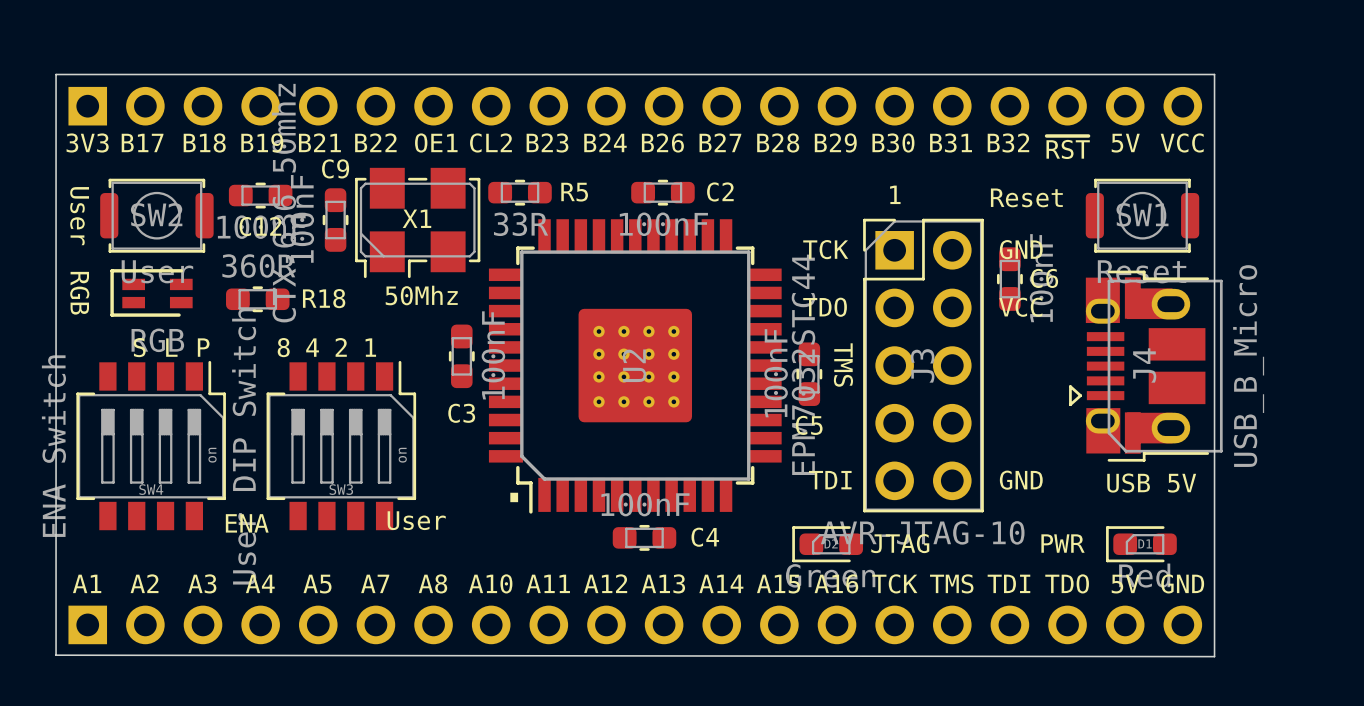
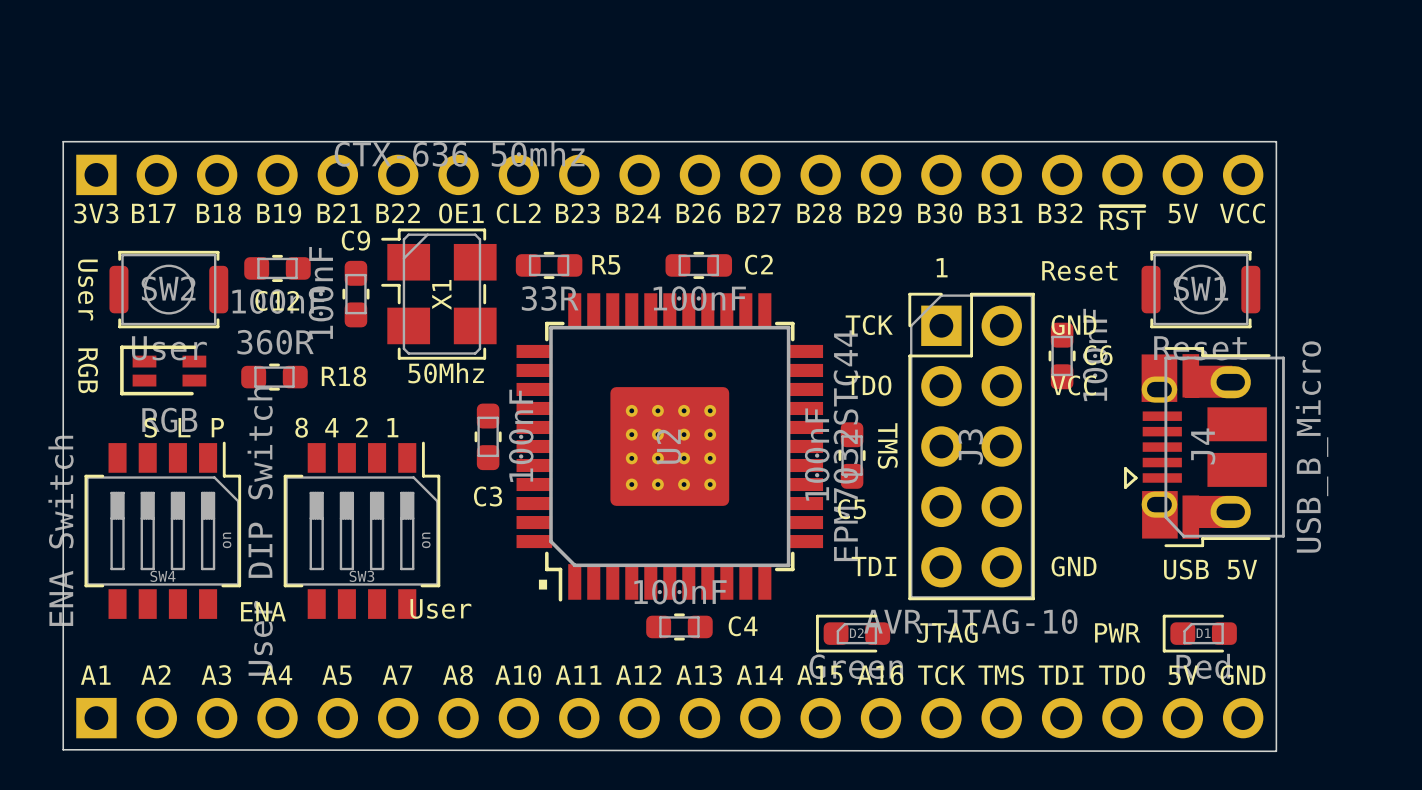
X1 rotation: 0° (417, 222) -> 90° clockwise (438, 294)
D2 position: (827, 544) -> (853, 633)

